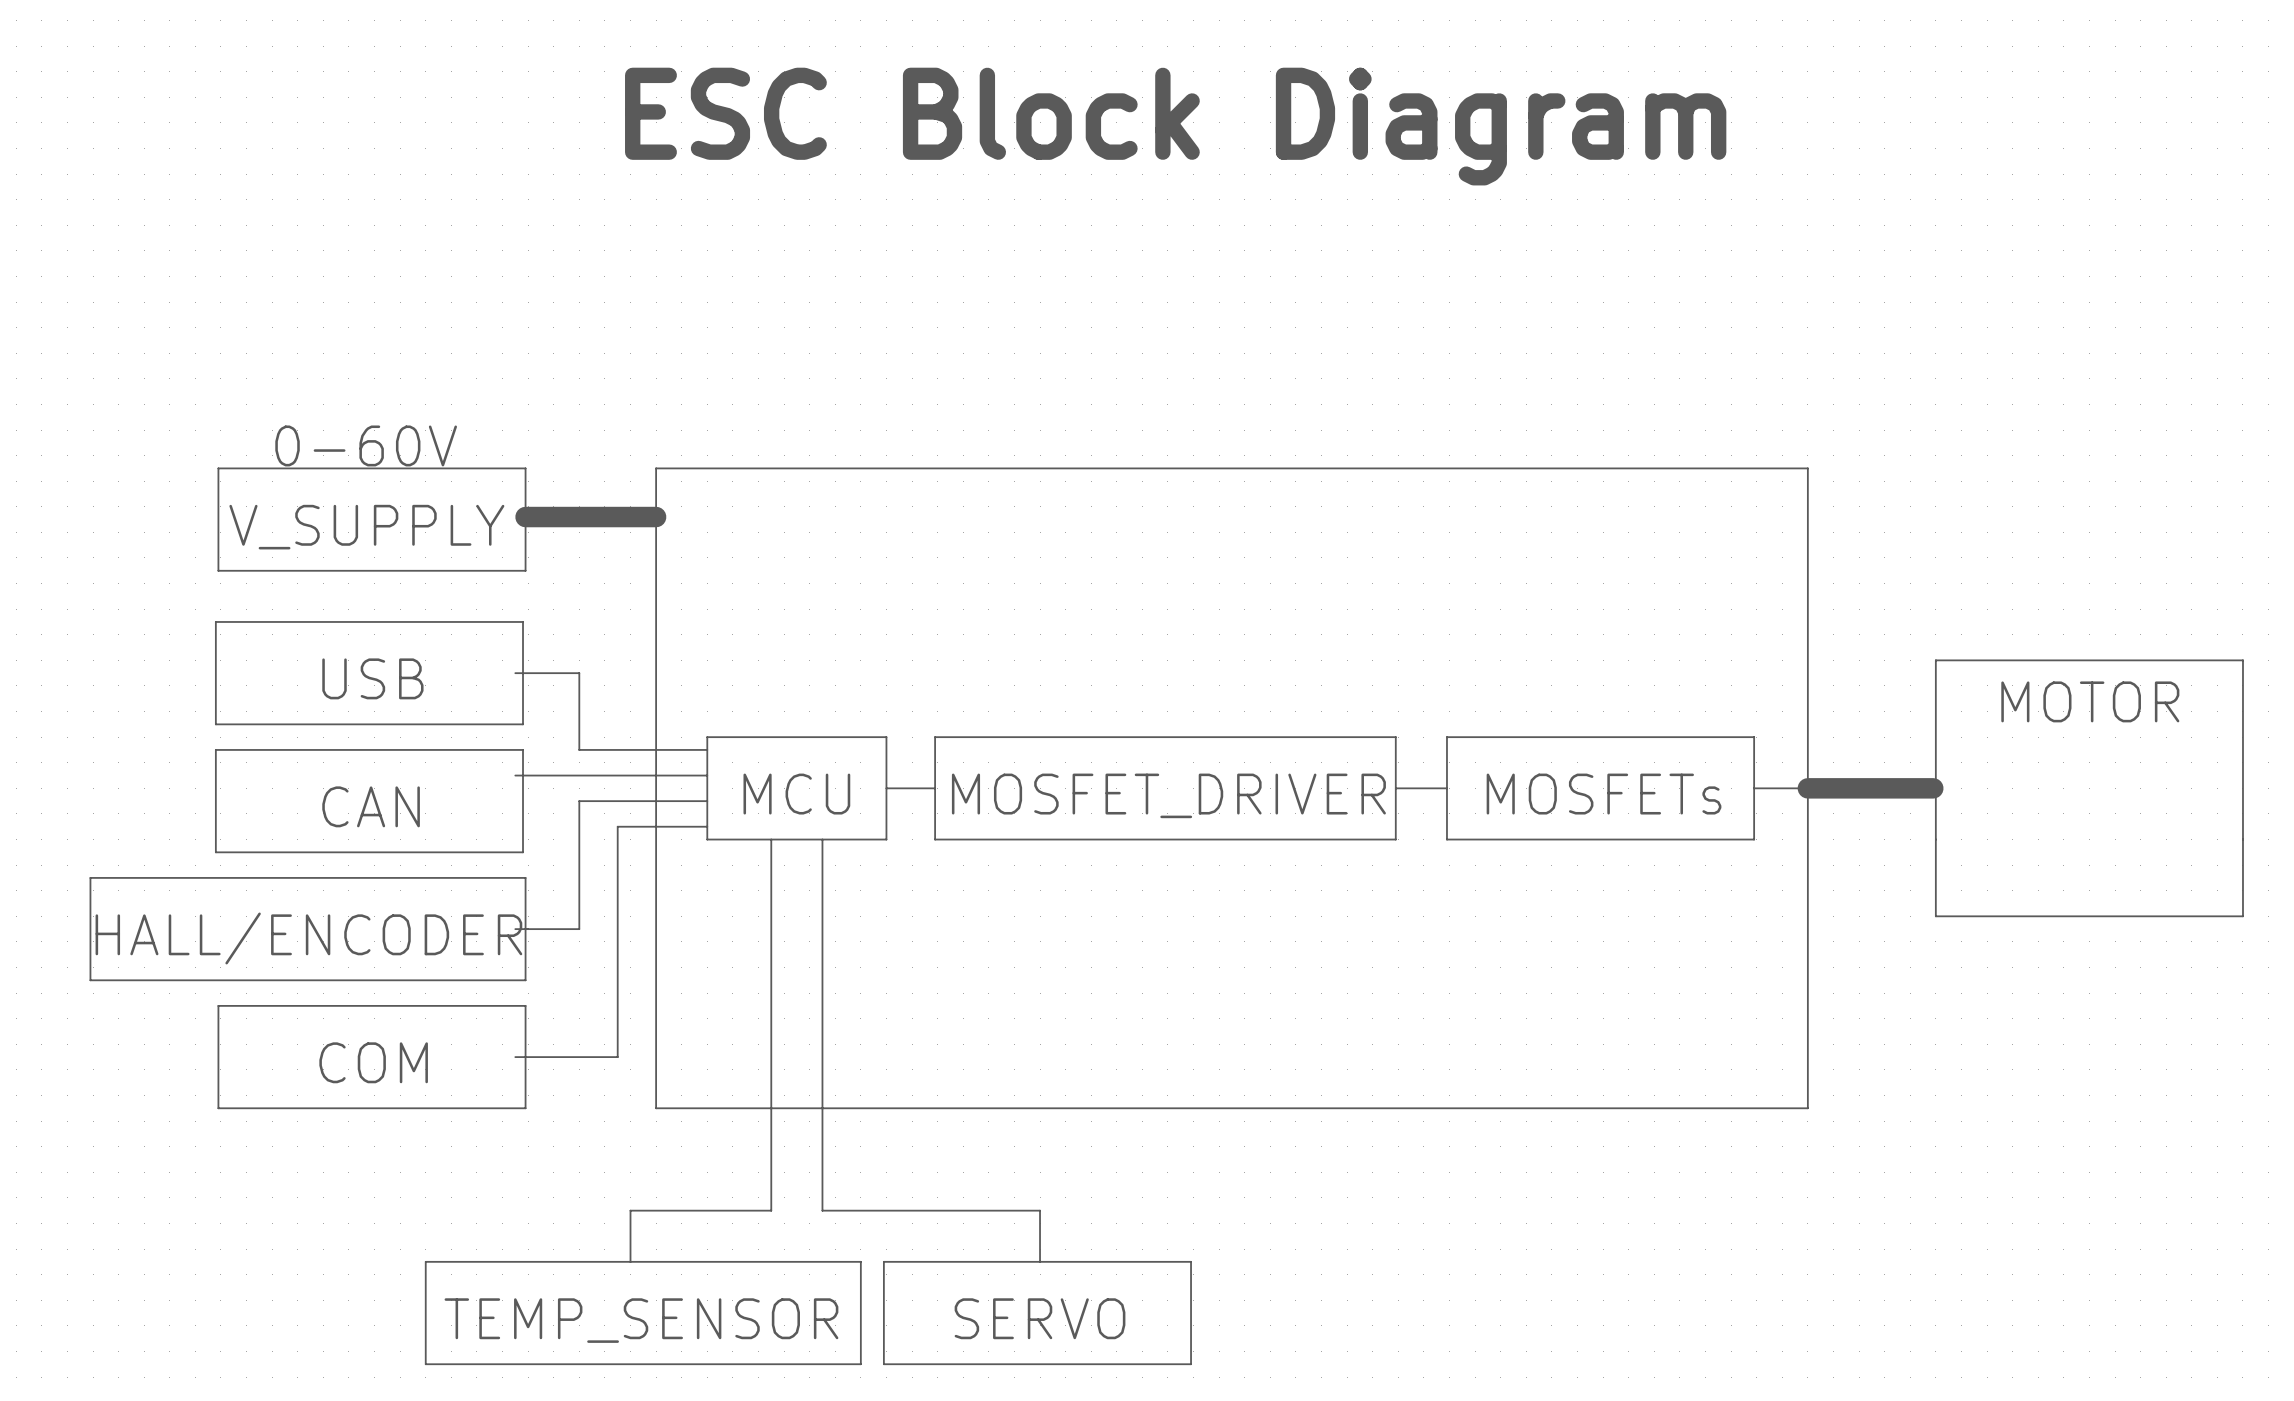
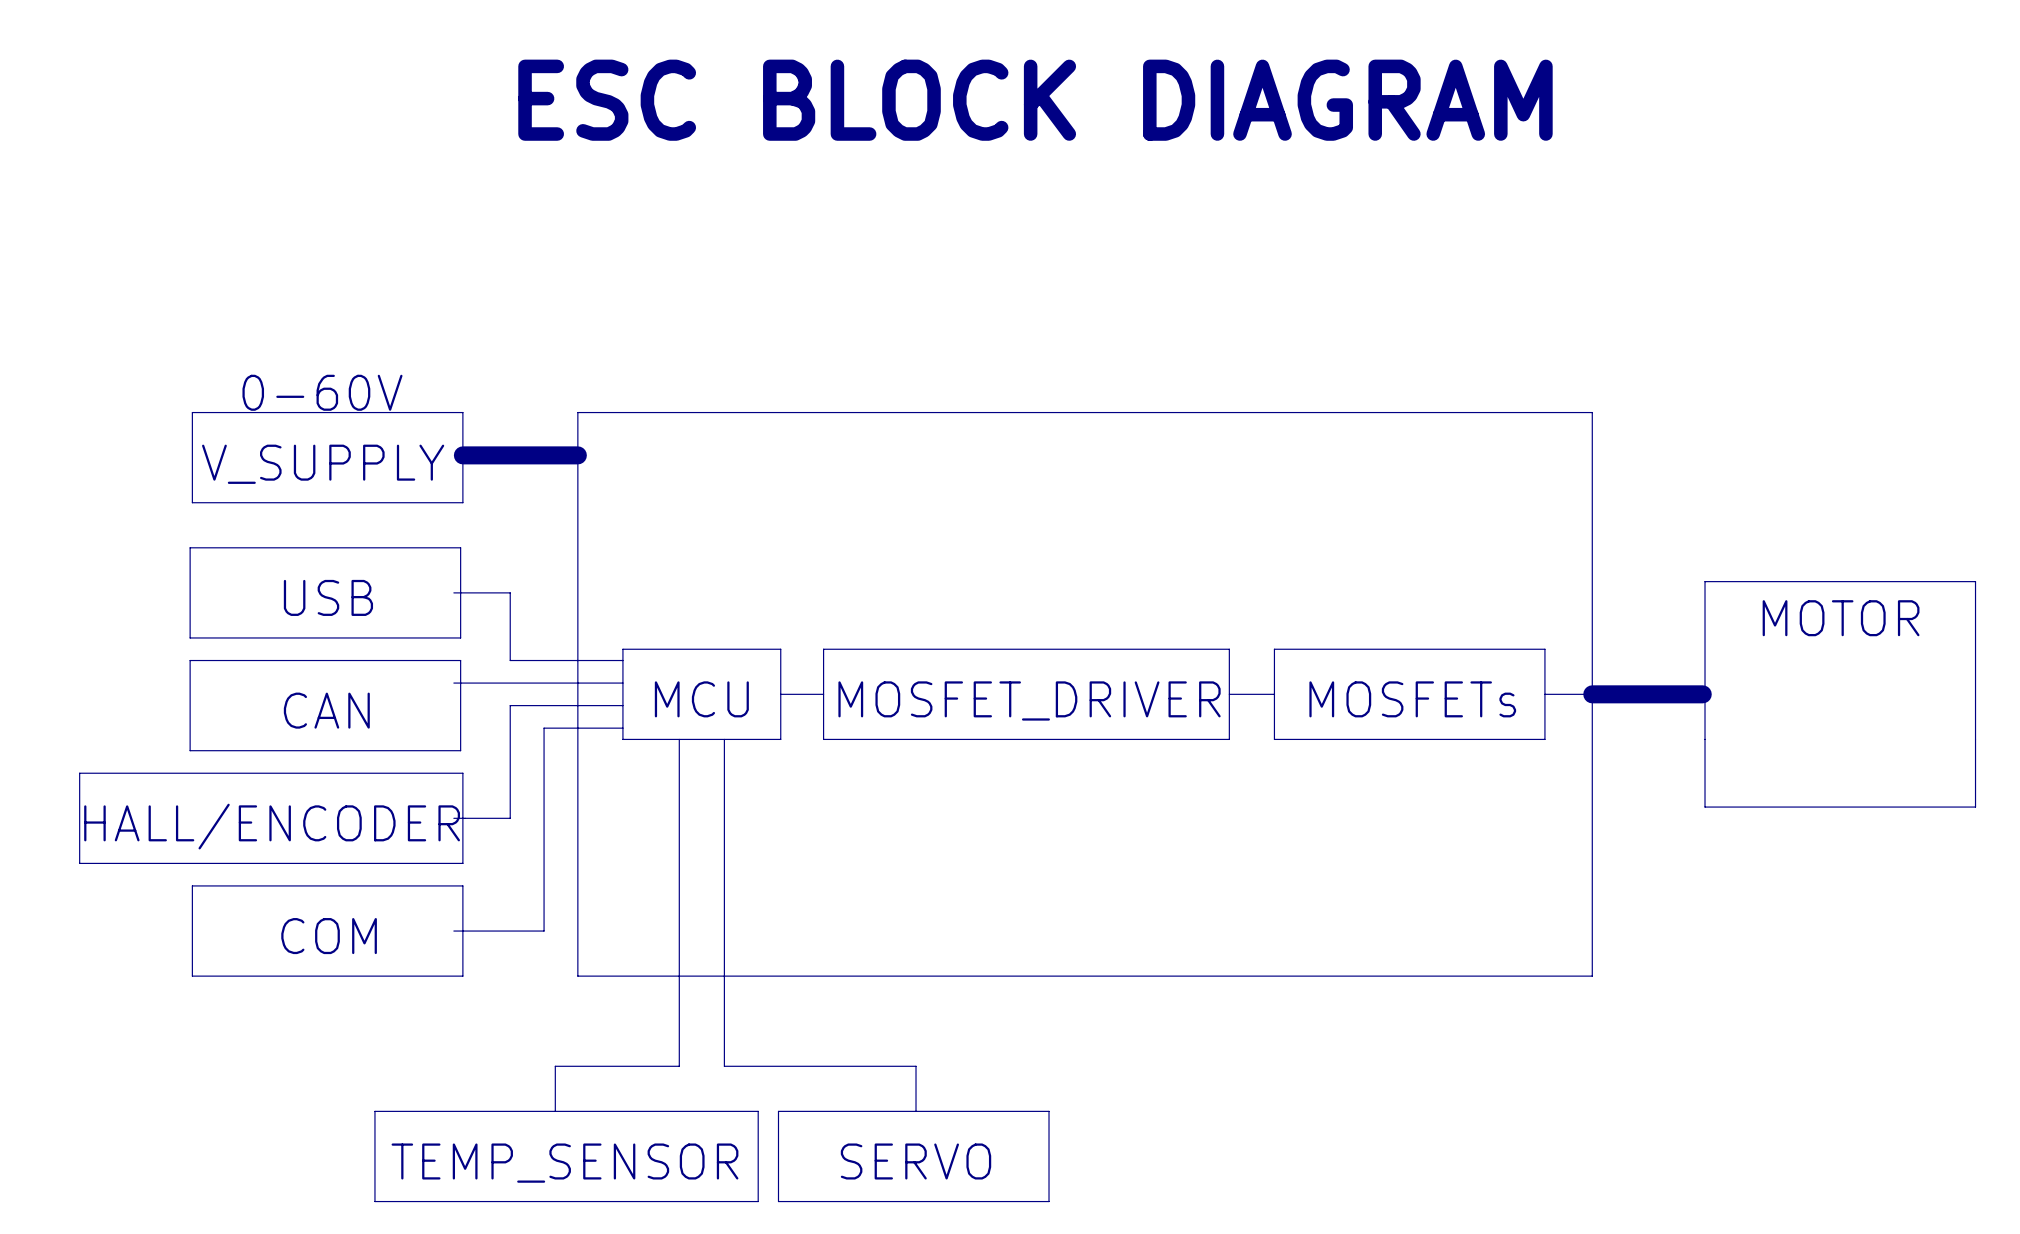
text: ESC Block Diagram (1175, 126) -> ESC BLOCK DIAGRAM (1035, 100)

